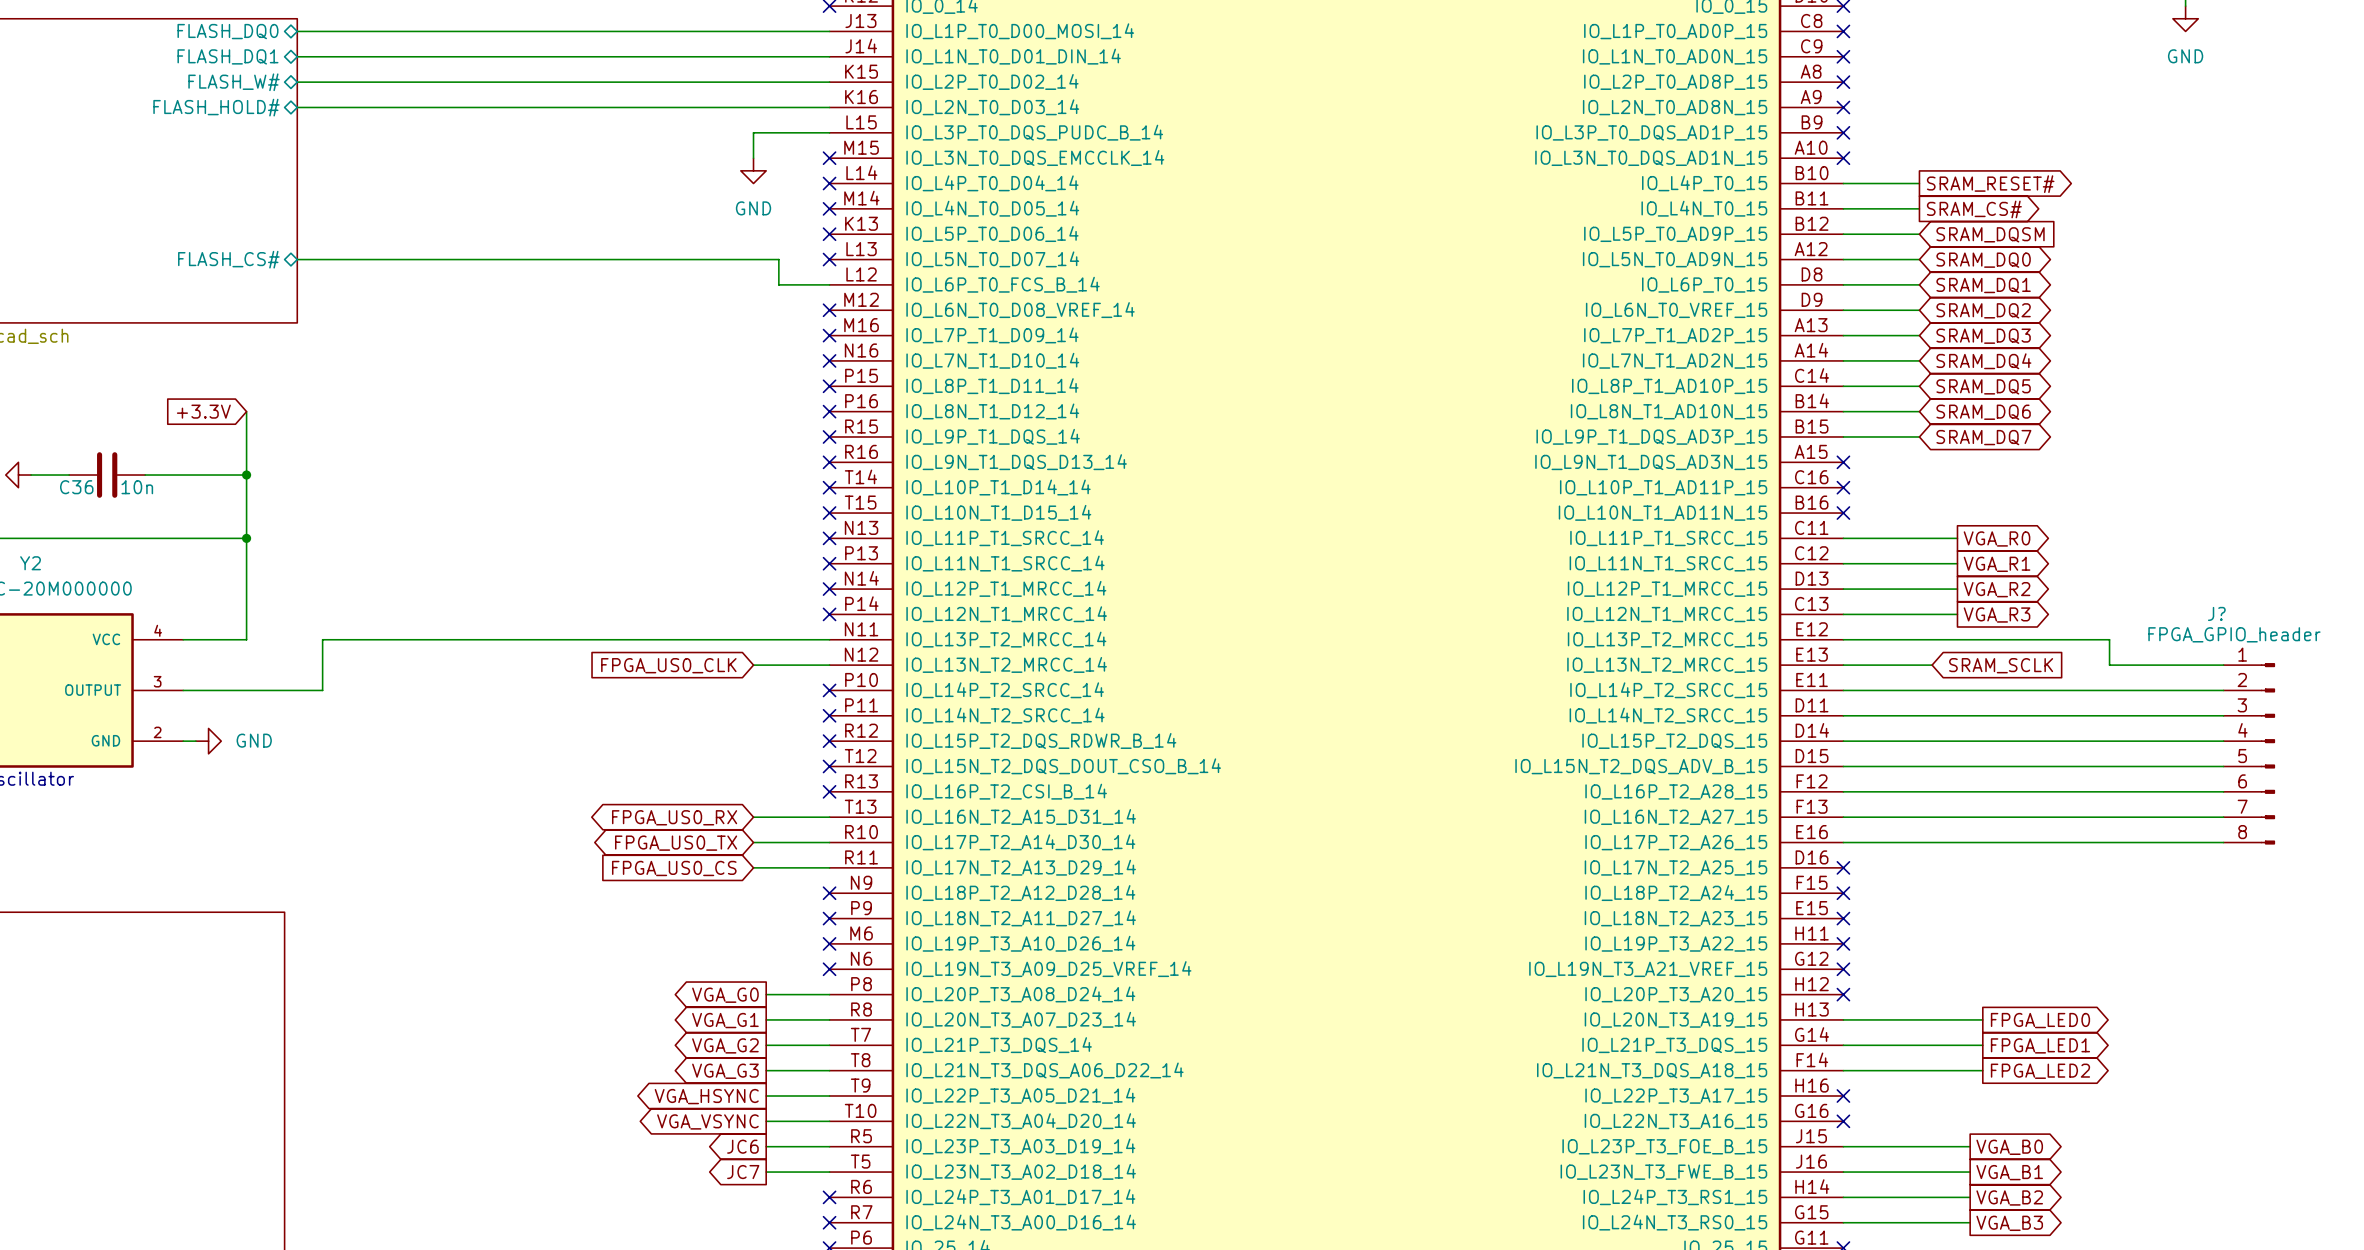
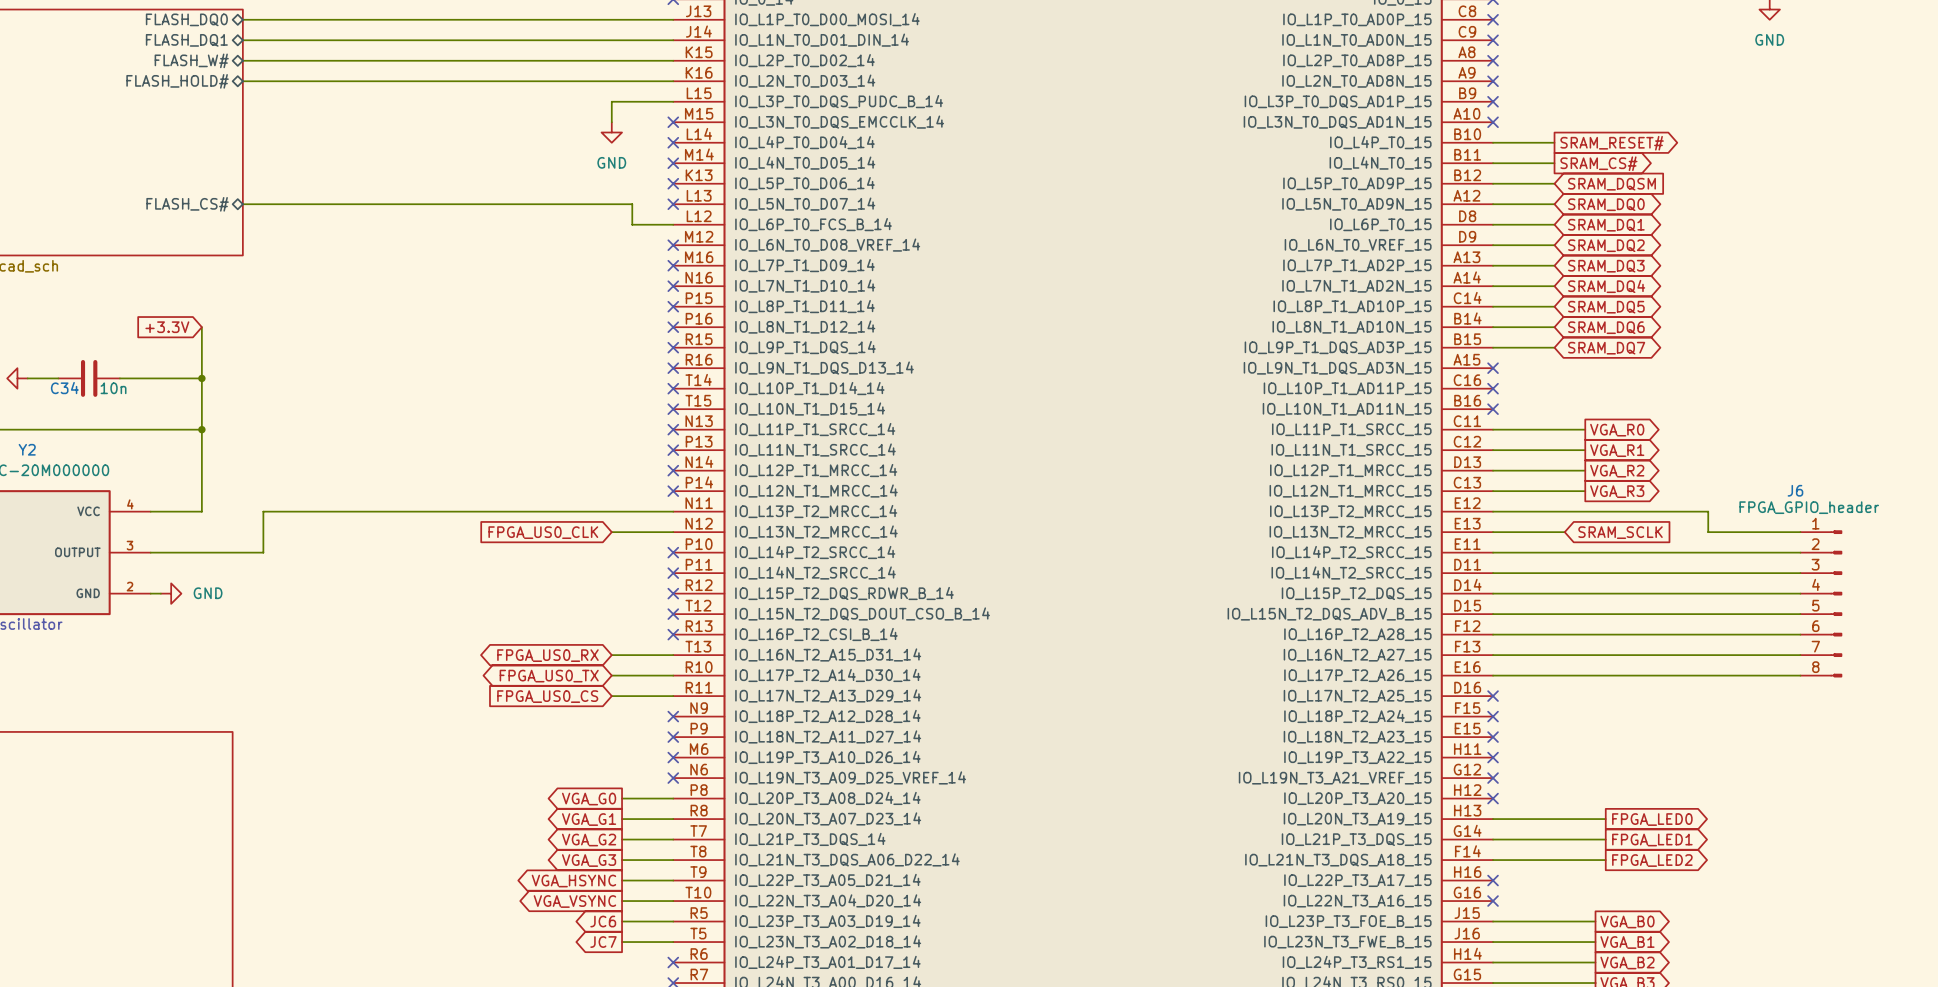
C36 name: C36 (76, 487) -> C34 (64, 388)
J? name: J? (2216, 613) -> J6 (1795, 490)

